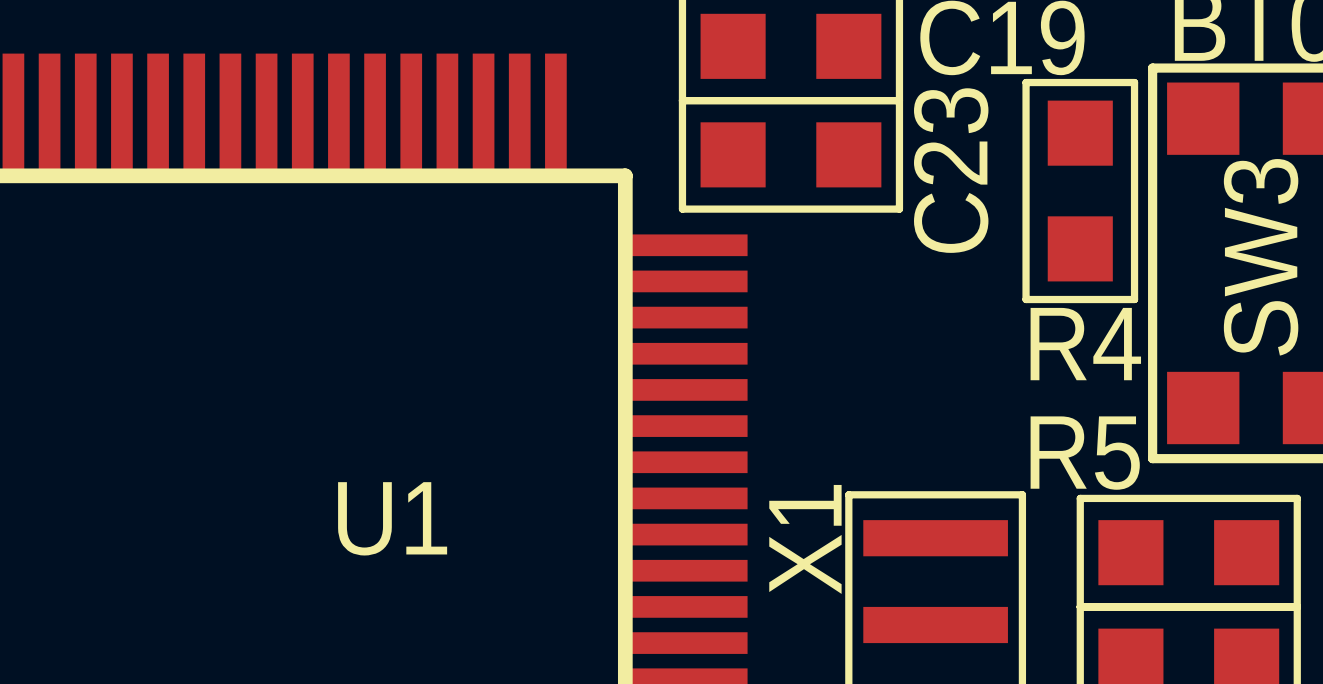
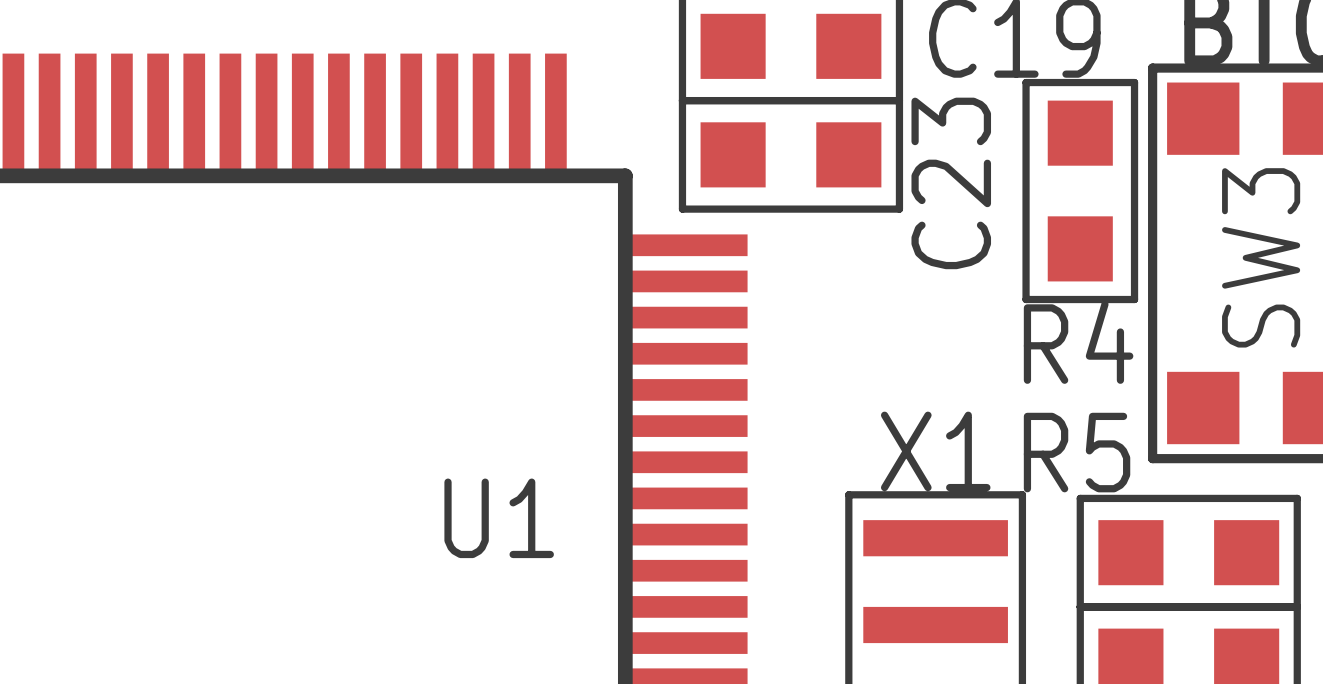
U1 name position: U1 (392, 518) -> U1 (499, 518)
X1 name rotation: 0° (805, 539) -> 90° clockwise (935, 451)

